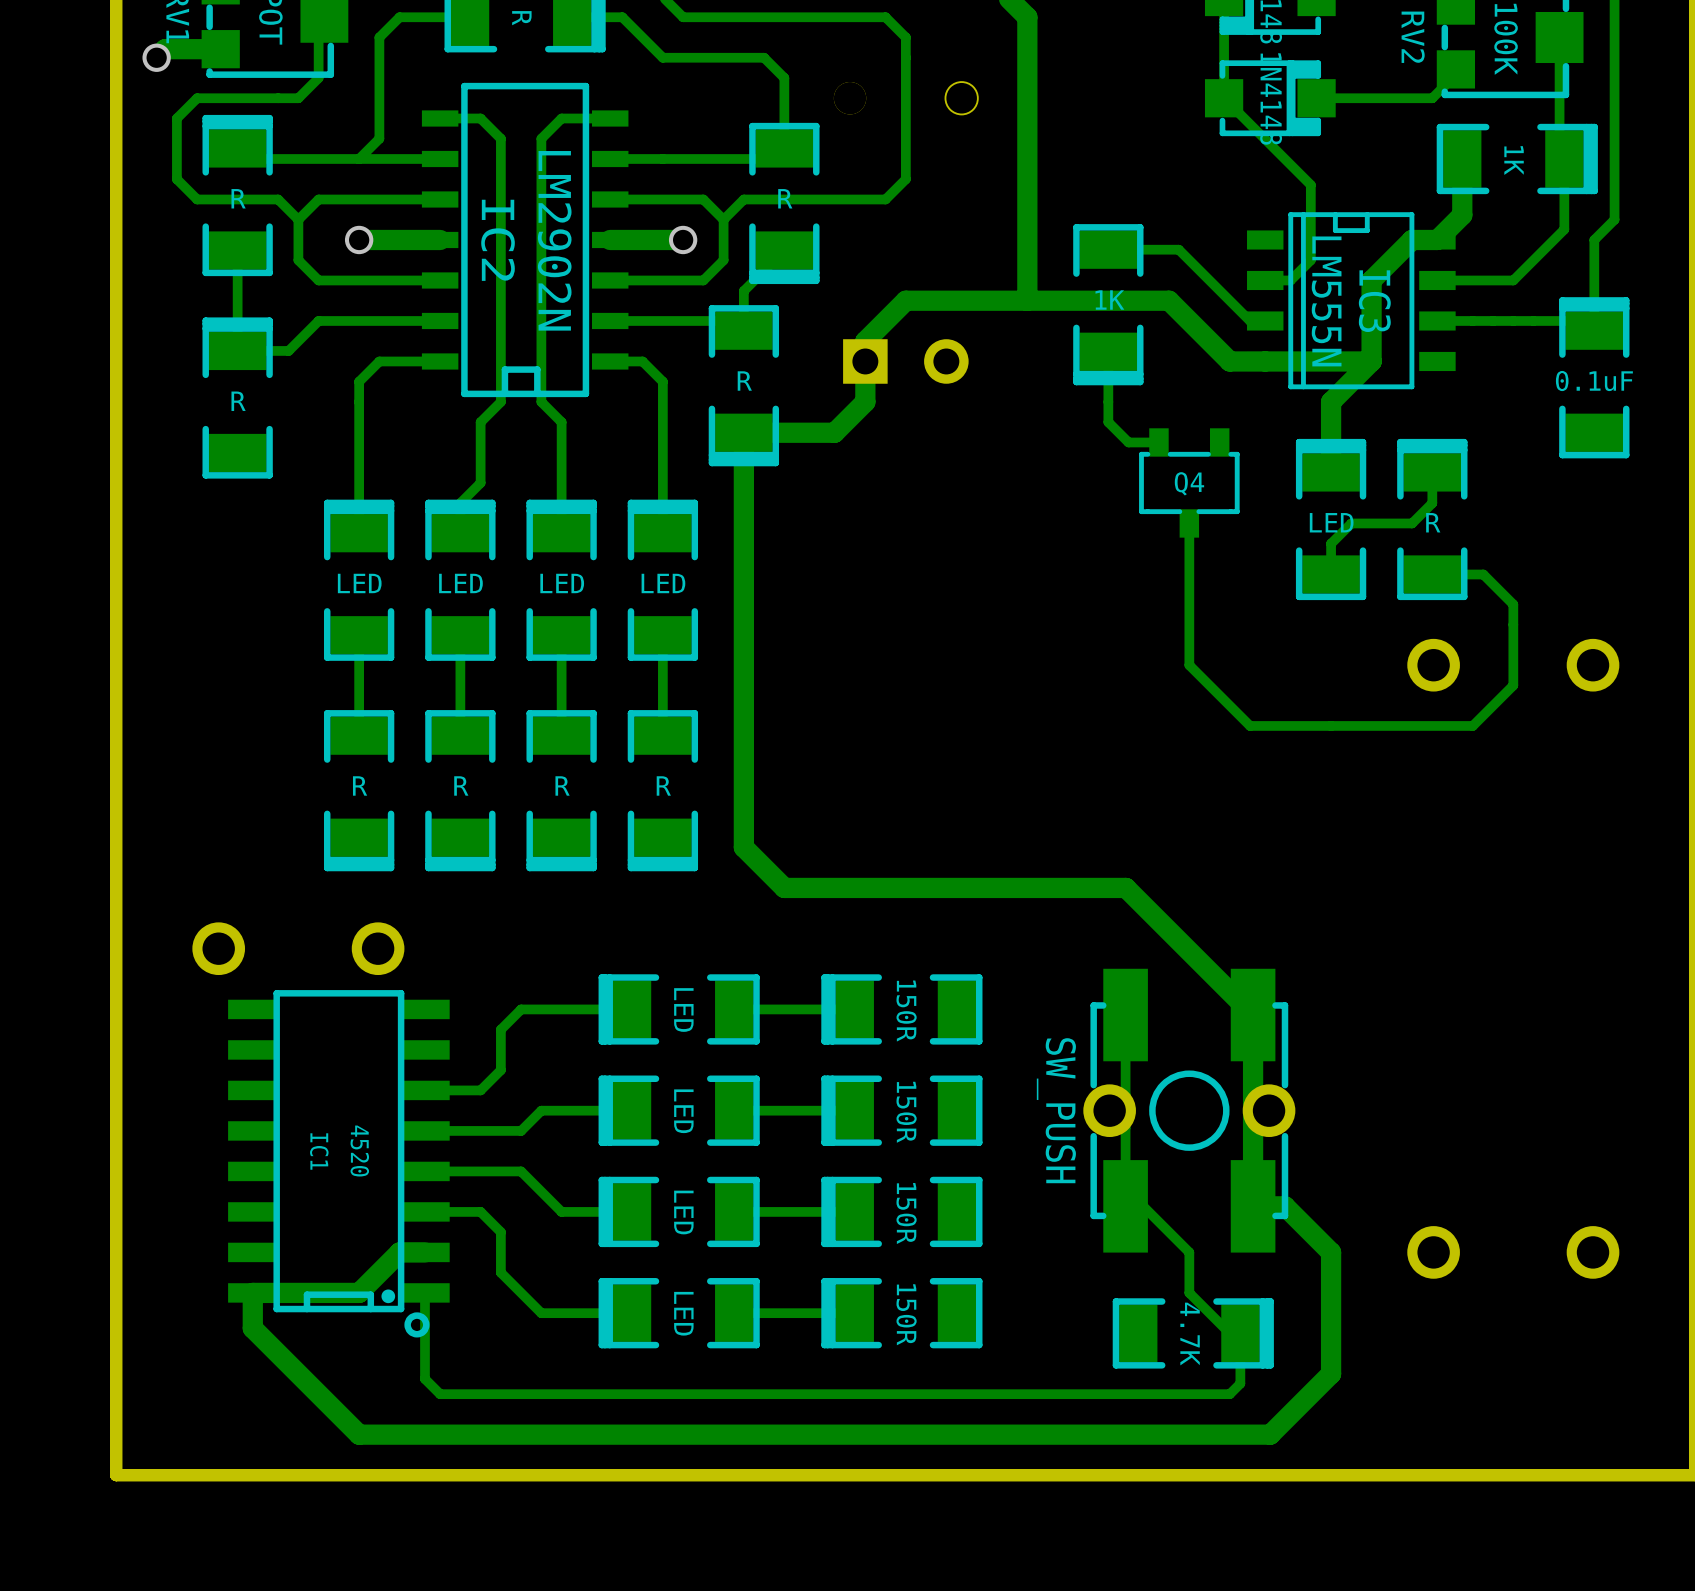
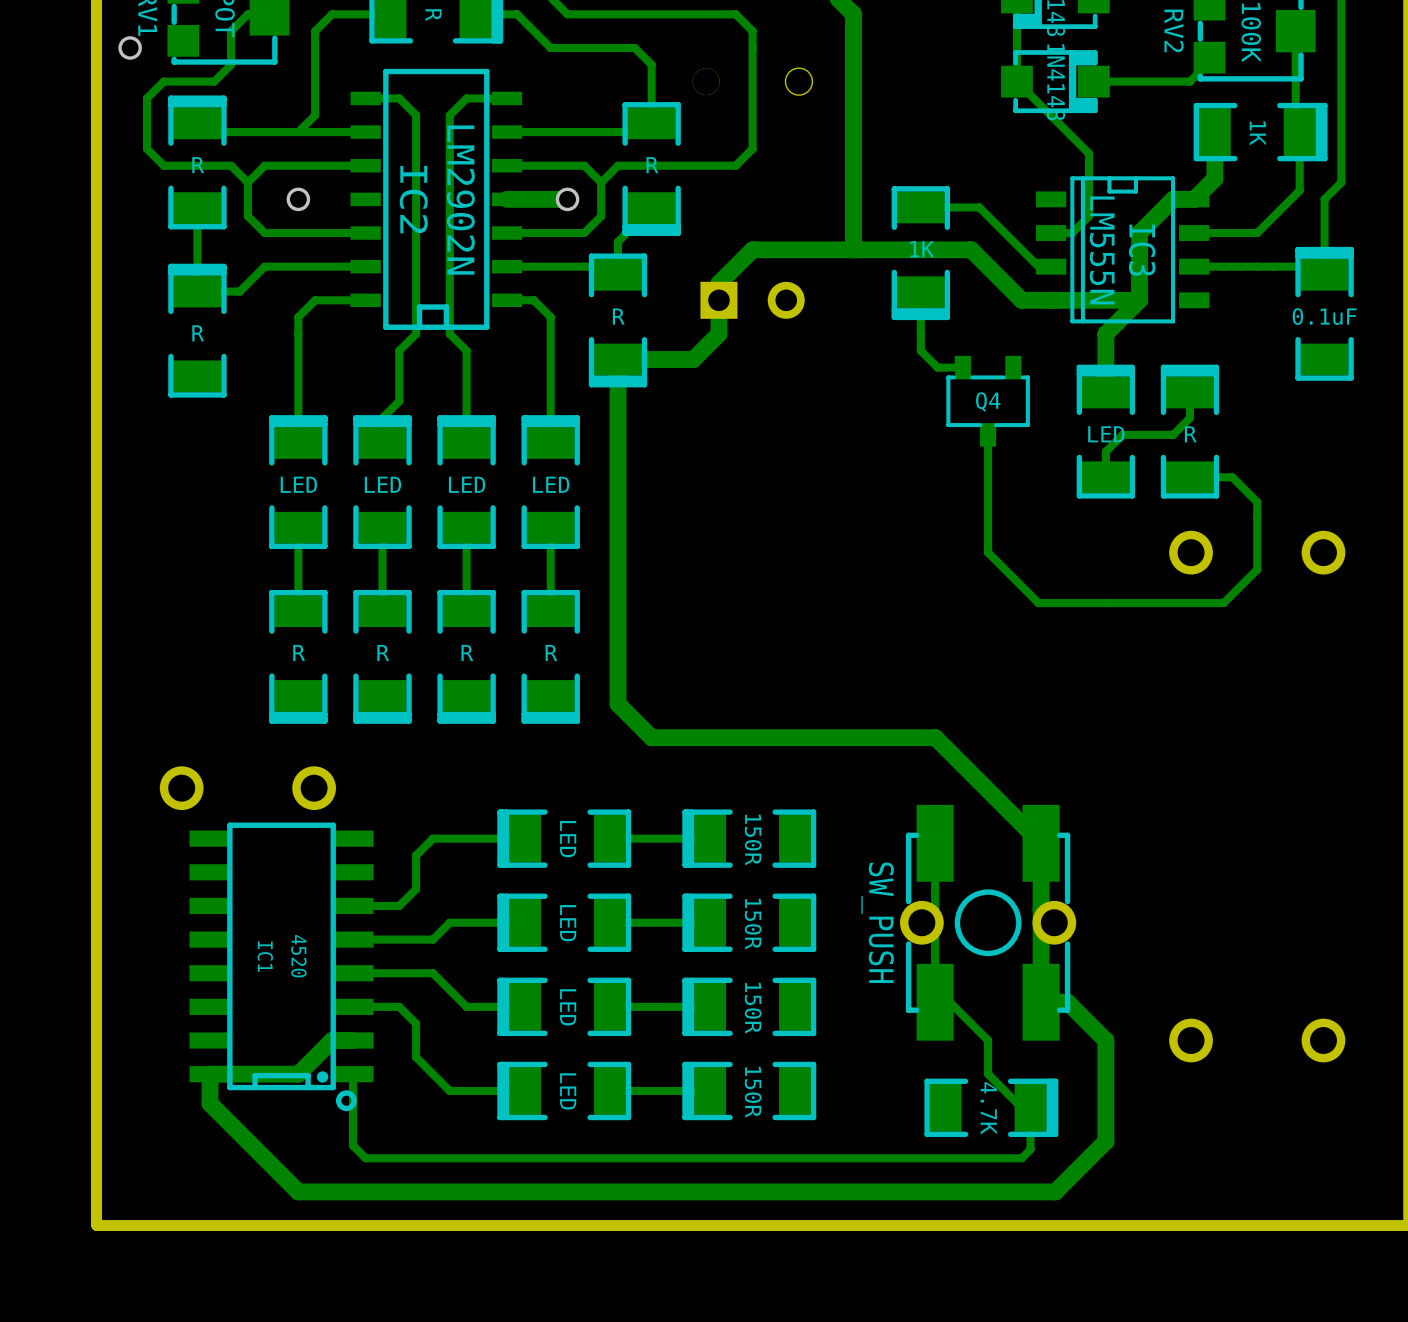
track: (324, 17) (318, 23) (318, 77) (298, 98) (257, 98) -> (269, 14) (247, 14) (231, 31) (231, 64) (214, 81)
track: (220, 49) (165, 49) (156, 57) -> none
track: (440, 239) (359, 239) -> none

